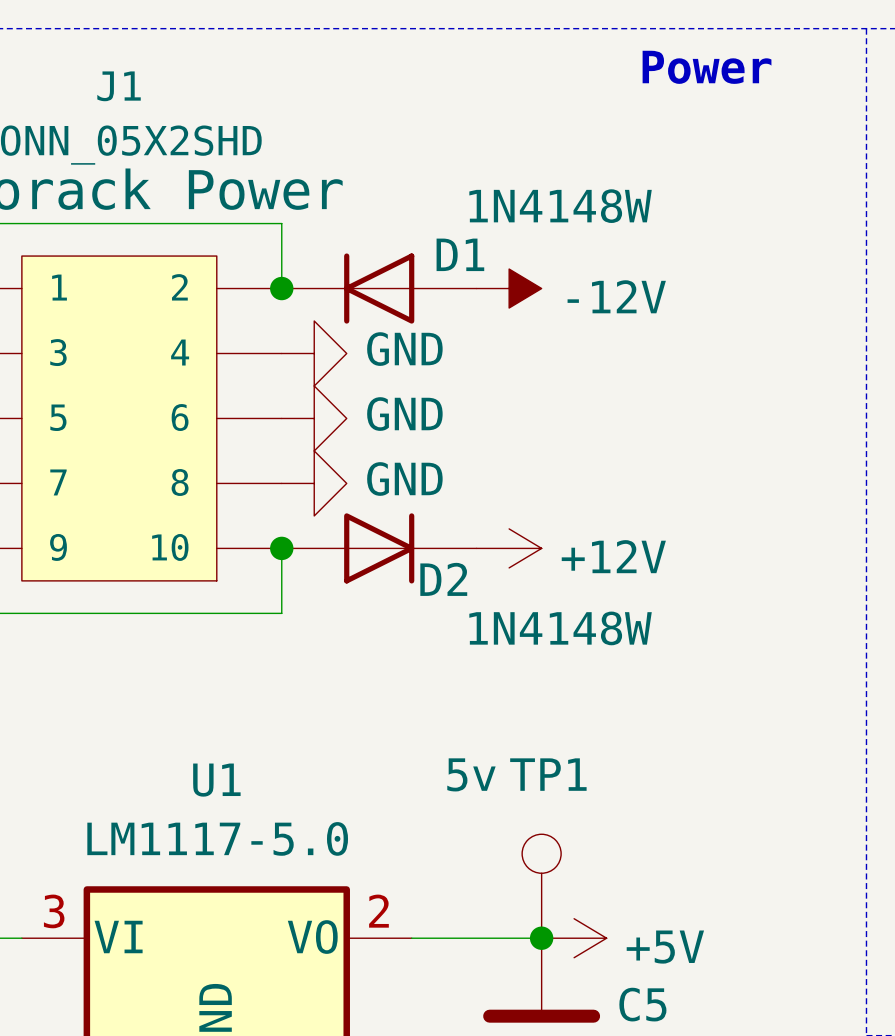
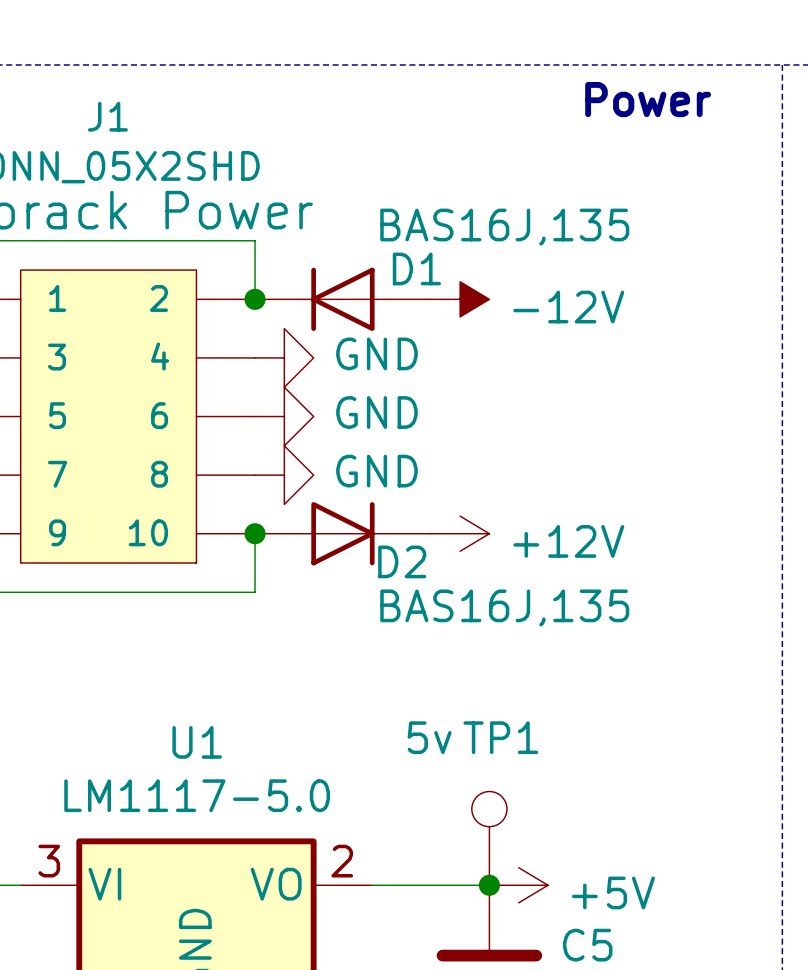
D1 value: 1N4148W (560, 206) -> BAS16J,135 (504, 227)
D2 value: 1N4148W (560, 628) -> BAS16J,135 (504, 607)

